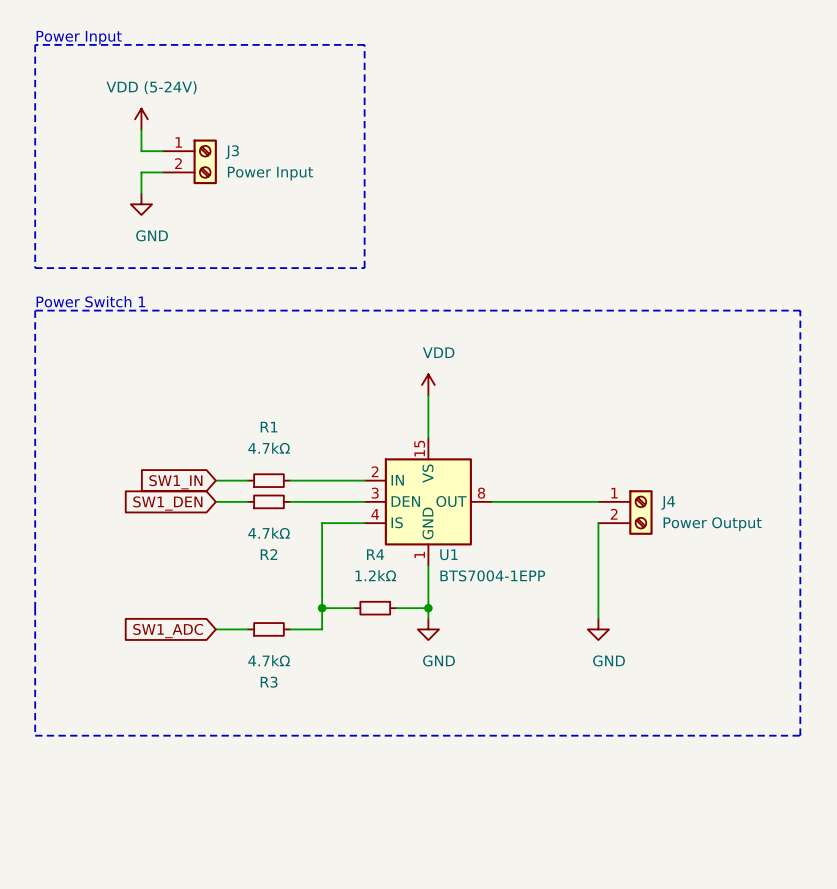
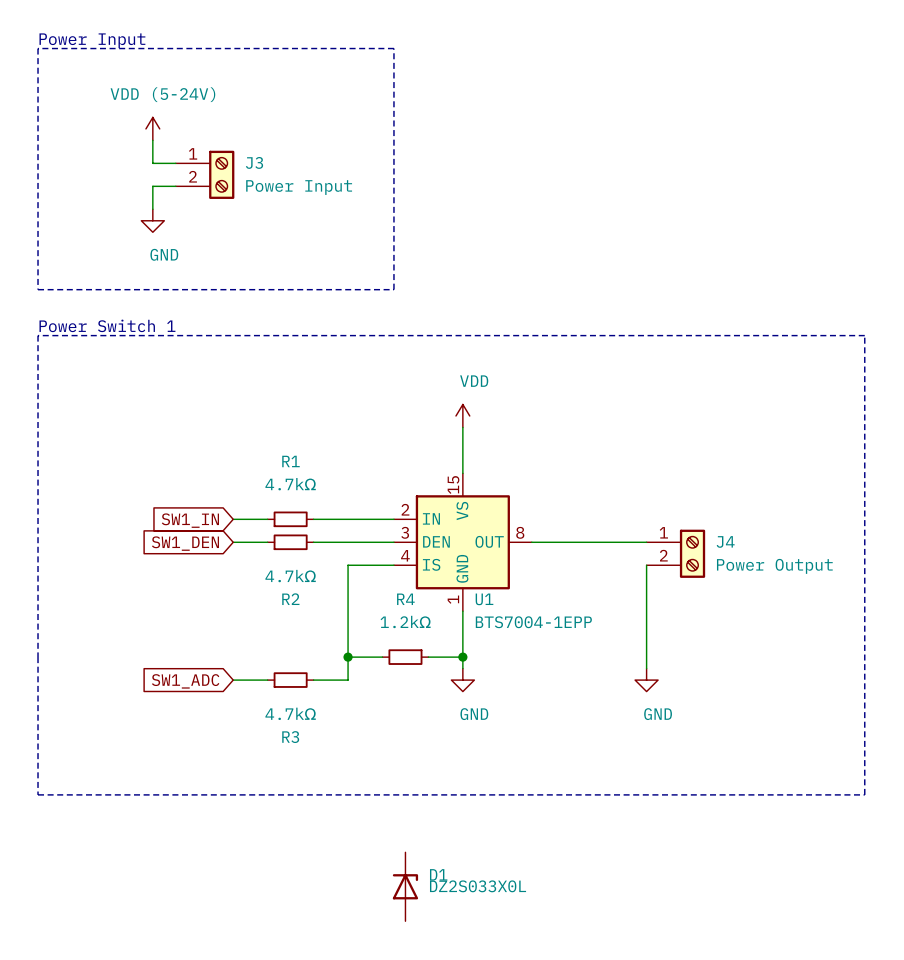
D1: none -> DZ2S033X0L (405, 886)

